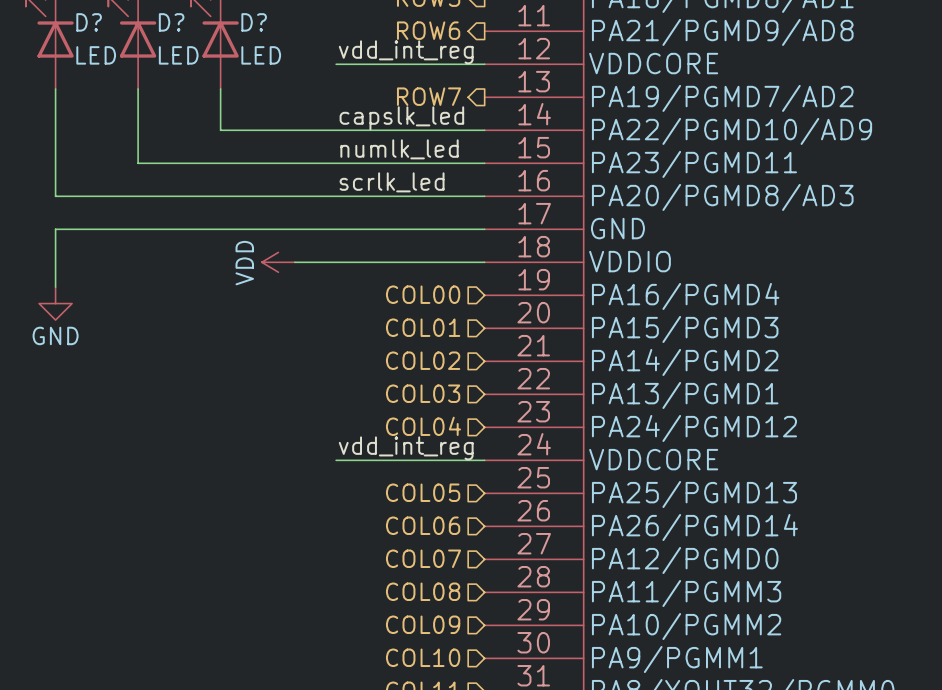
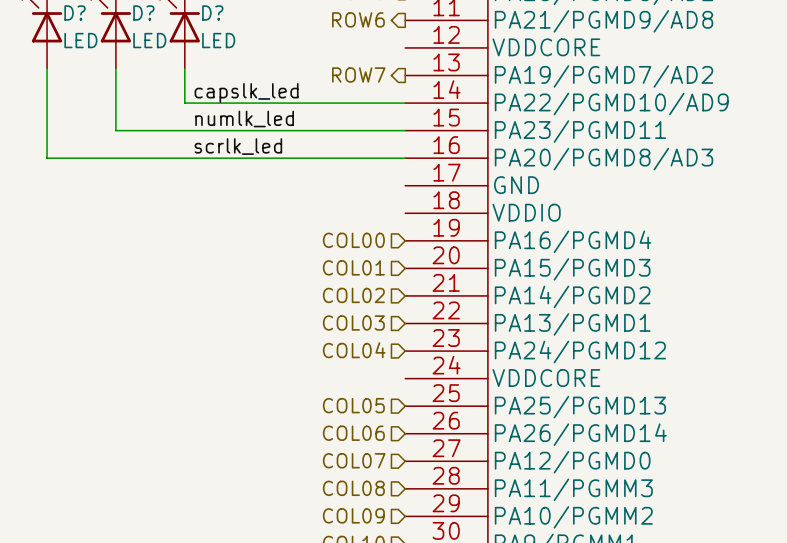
label: vdd_int_reg (406, 52) -> none
wire: (336, 64) (484, 64) -> none
label position: capslk_led (401, 118) -> capslk_led (246, 93)
label position: numlk_led (399, 149) -> numlk_led (244, 118)
label position: scrlk_led (392, 182) -> scrlk_led (238, 146)
wire: (484, 229) (55, 229) (55, 287) -> none
power symbol: VDD (278, 262) -> none
wire: (294, 262) (484, 262) -> none
power symbol: GND (55, 303) -> none
label: vdd_int_reg (406, 448) -> none
wire: (336, 460) (484, 460) -> none

